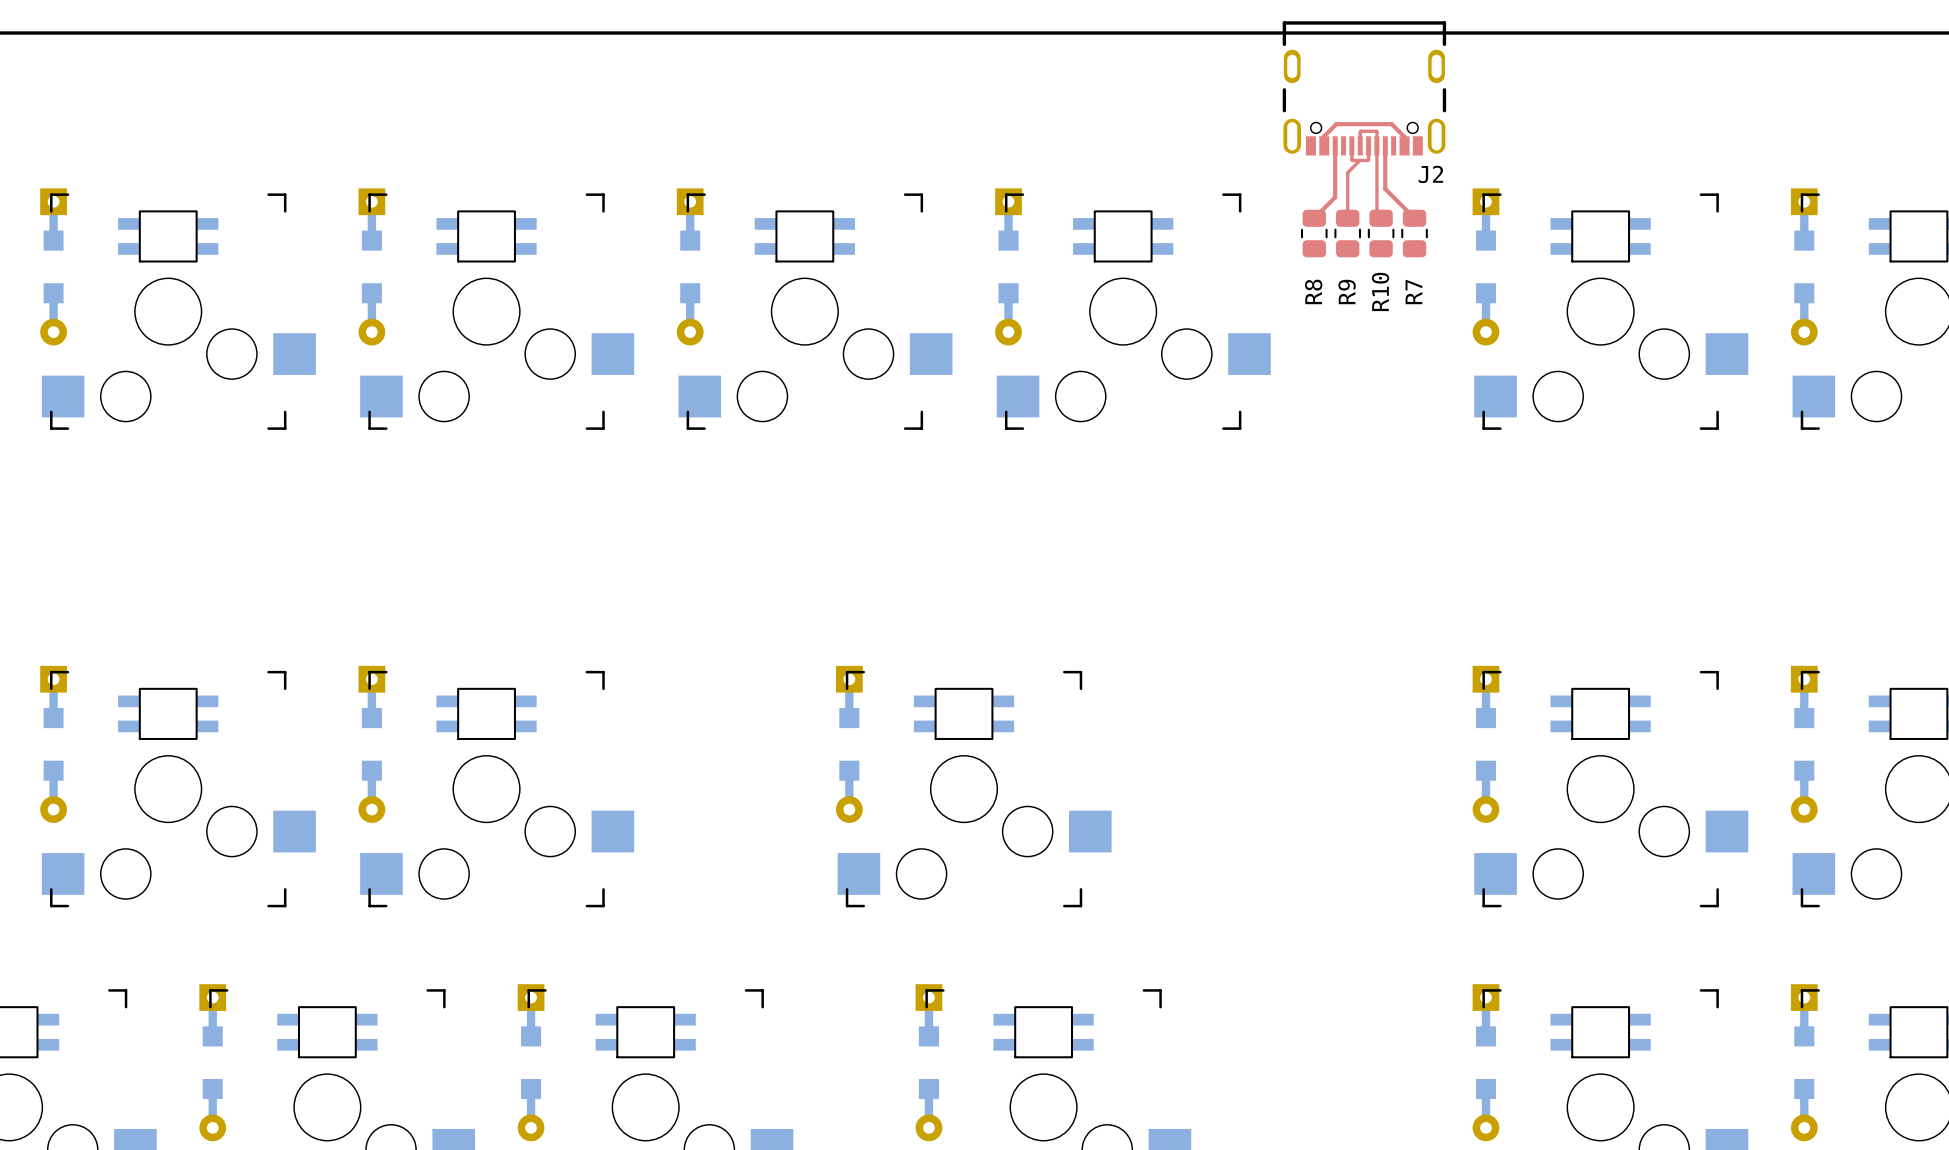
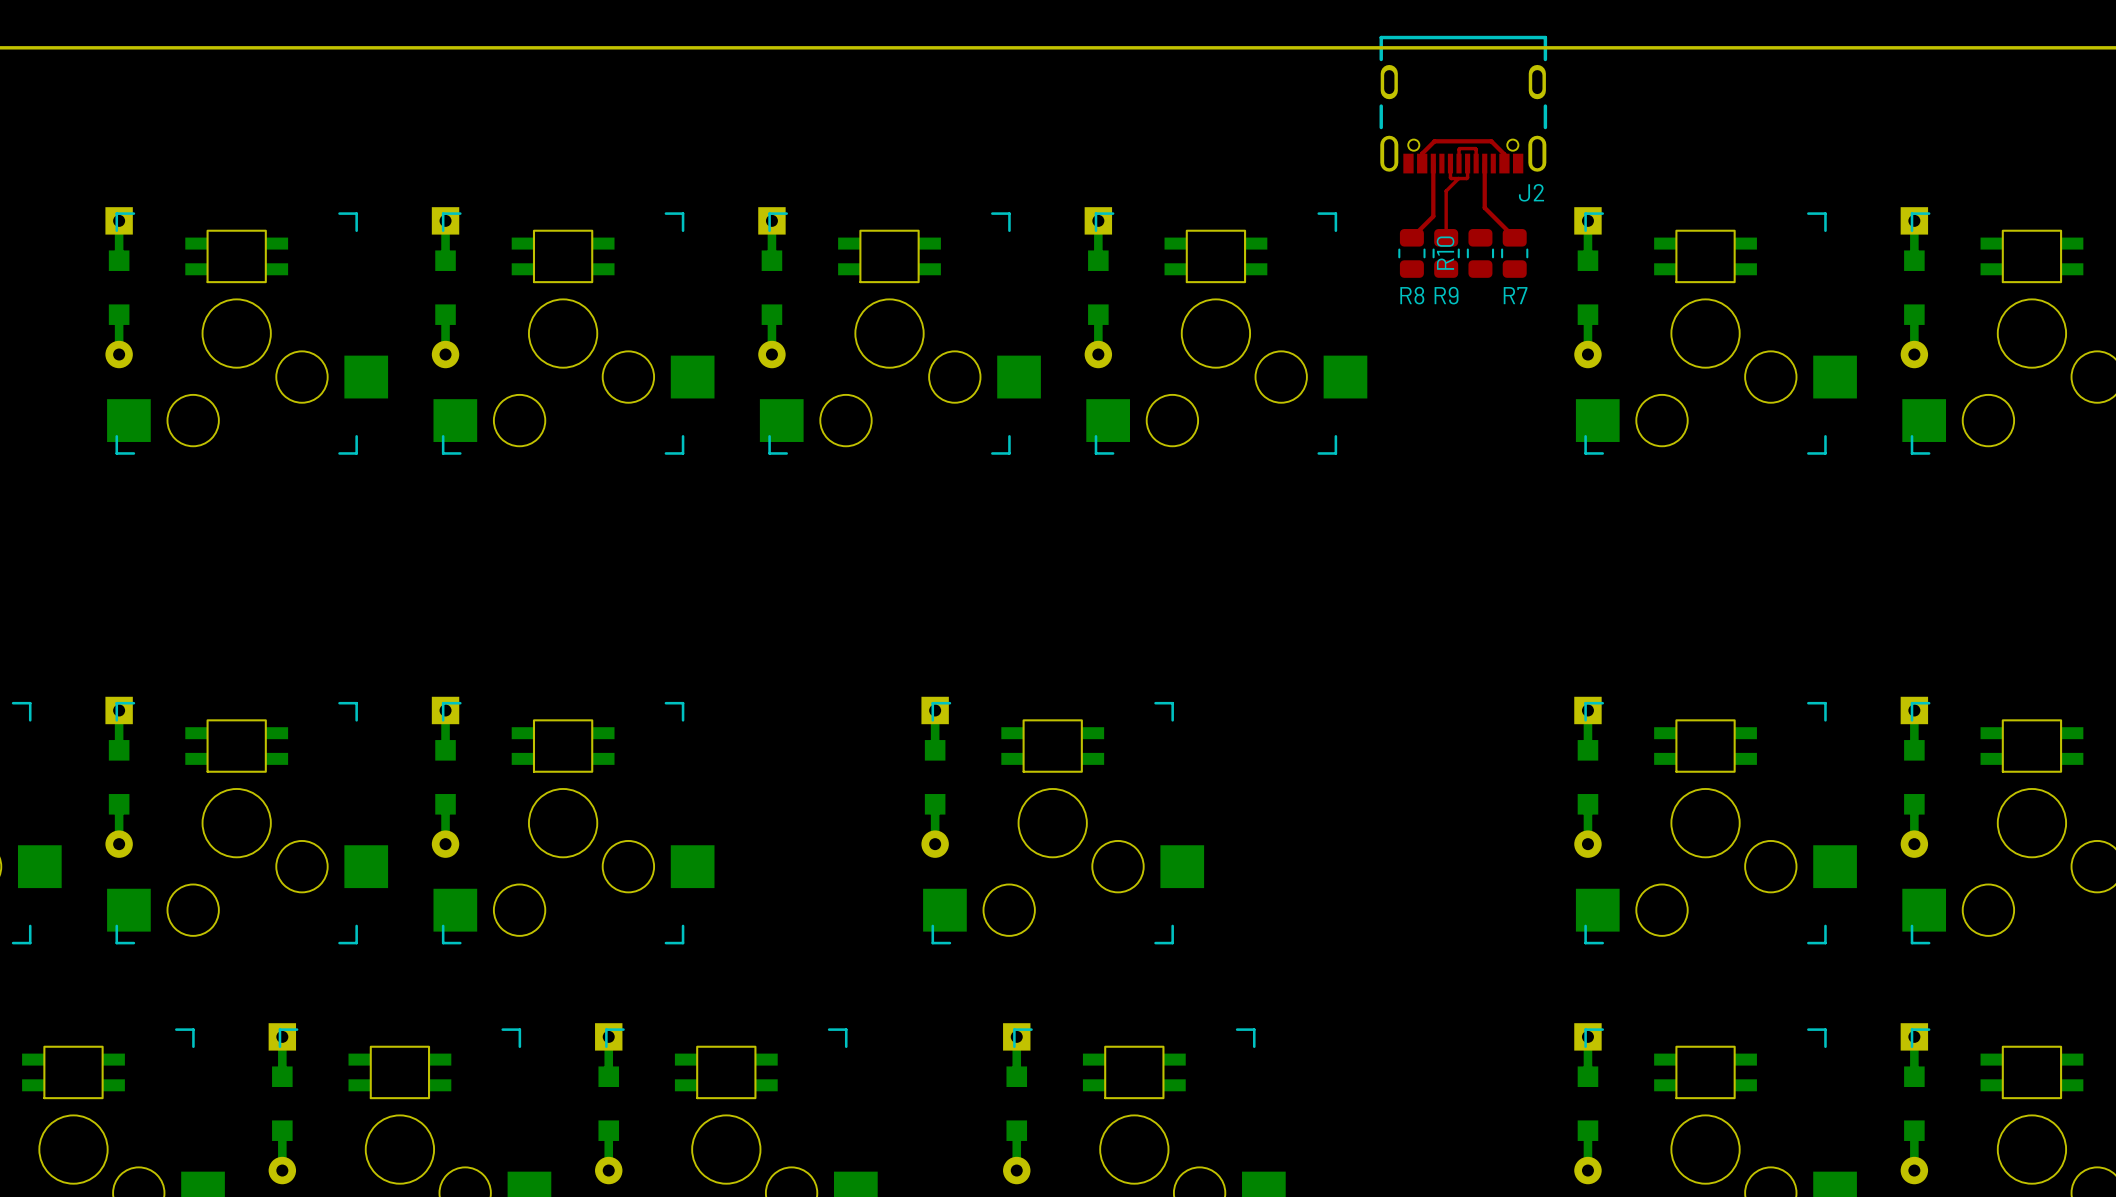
top track: (1376, 145) (1376, 214) (1381, 218) -> none
R8 name rotation: 0° (1313, 291) -> 90° clockwise (1412, 295)
R9 name rotation: 0° (1347, 291) -> 90° clockwise (1446, 295)
R10 name position: R10 (1380, 291) -> R10 (1445, 253)
R7 name rotation: 0° (1413, 292) -> 90° clockwise (1515, 295)

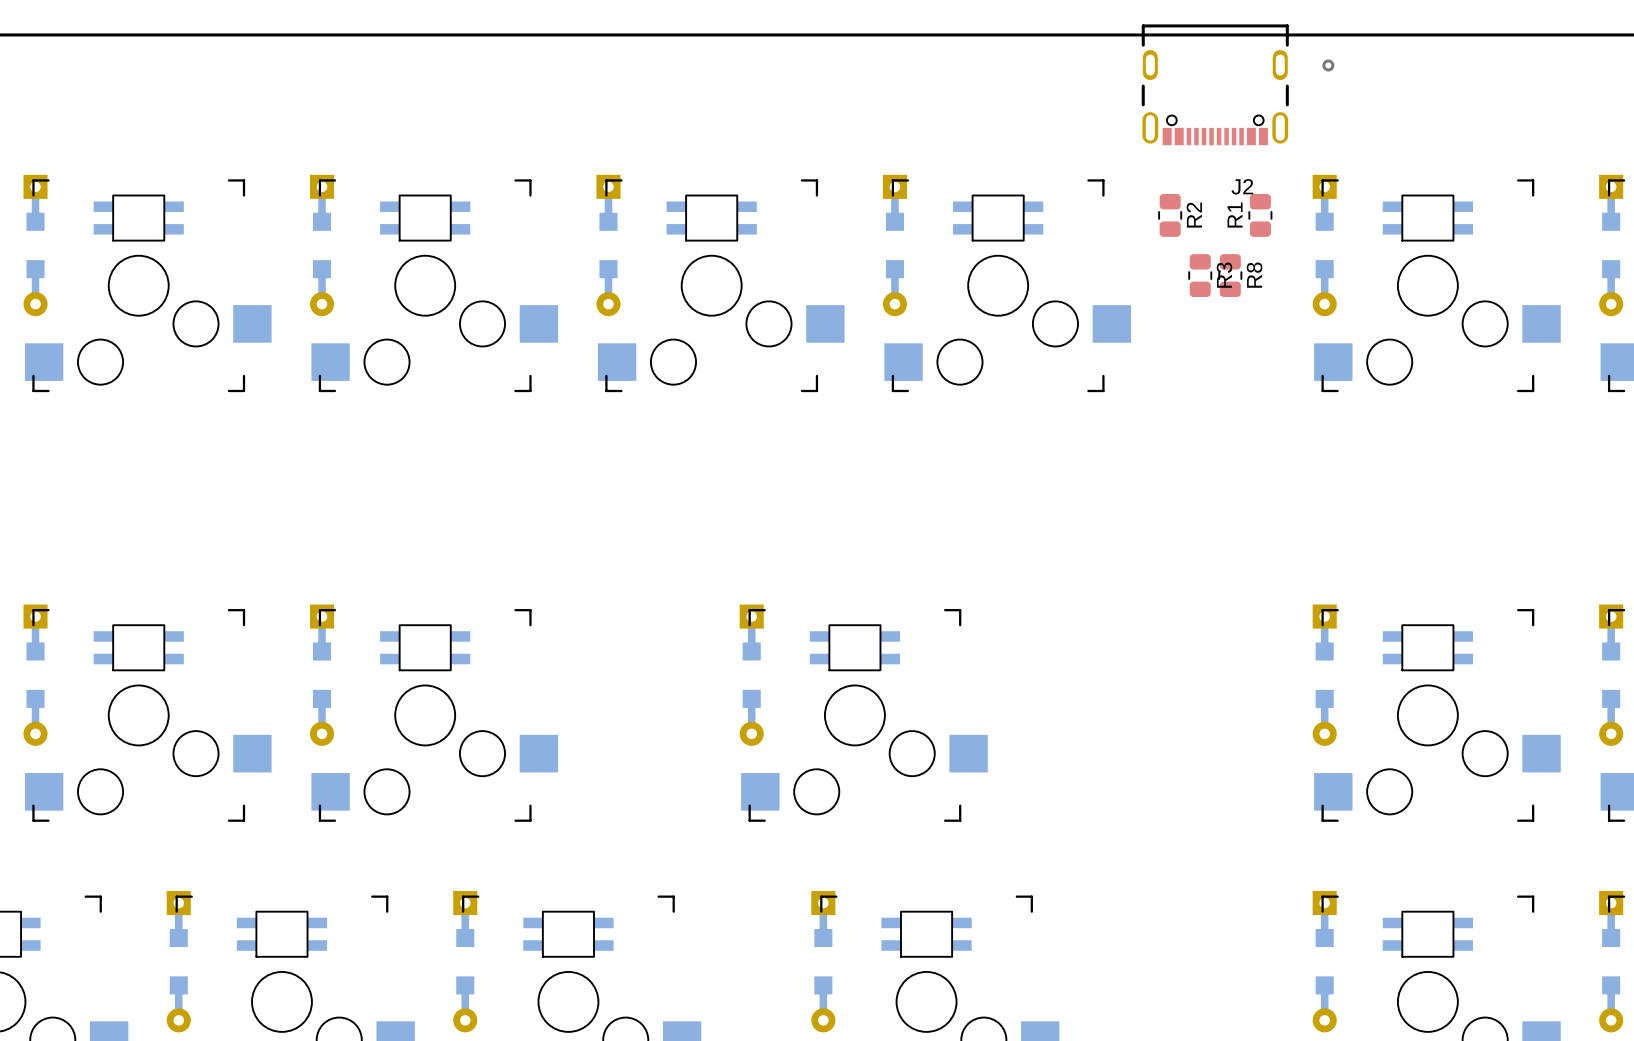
via: none -> (1328, 65)
top track: (1422, 163) (1422, 153) (1434, 141) (1491, 141) (1504, 154) (1504, 163) -> none
top track: (1433, 163) (1433, 216) (1411, 237) -> none
top track: (1450, 163) (1451, 178) (1466, 178) (1467, 163) -> none
top track: (1459, 163) (1459, 148) (1475, 148) (1476, 163) -> none
top track: (1484, 163) (1484, 207) (1514, 237) -> none
top track: (1458, 178) (1446, 191) (1446, 237) -> none
J2 name position: J2 (1531, 192) -> J2 (1242, 186)
R9: (1446, 253) -> none
R10: (1480, 253) -> none
R8 name: R8 (1412, 295) -> R2 (1194, 215)
R7 name: R7 (1515, 295) -> R1 (1235, 215)
R3: none -> (1200, 275)
R8: none -> (1230, 275)

